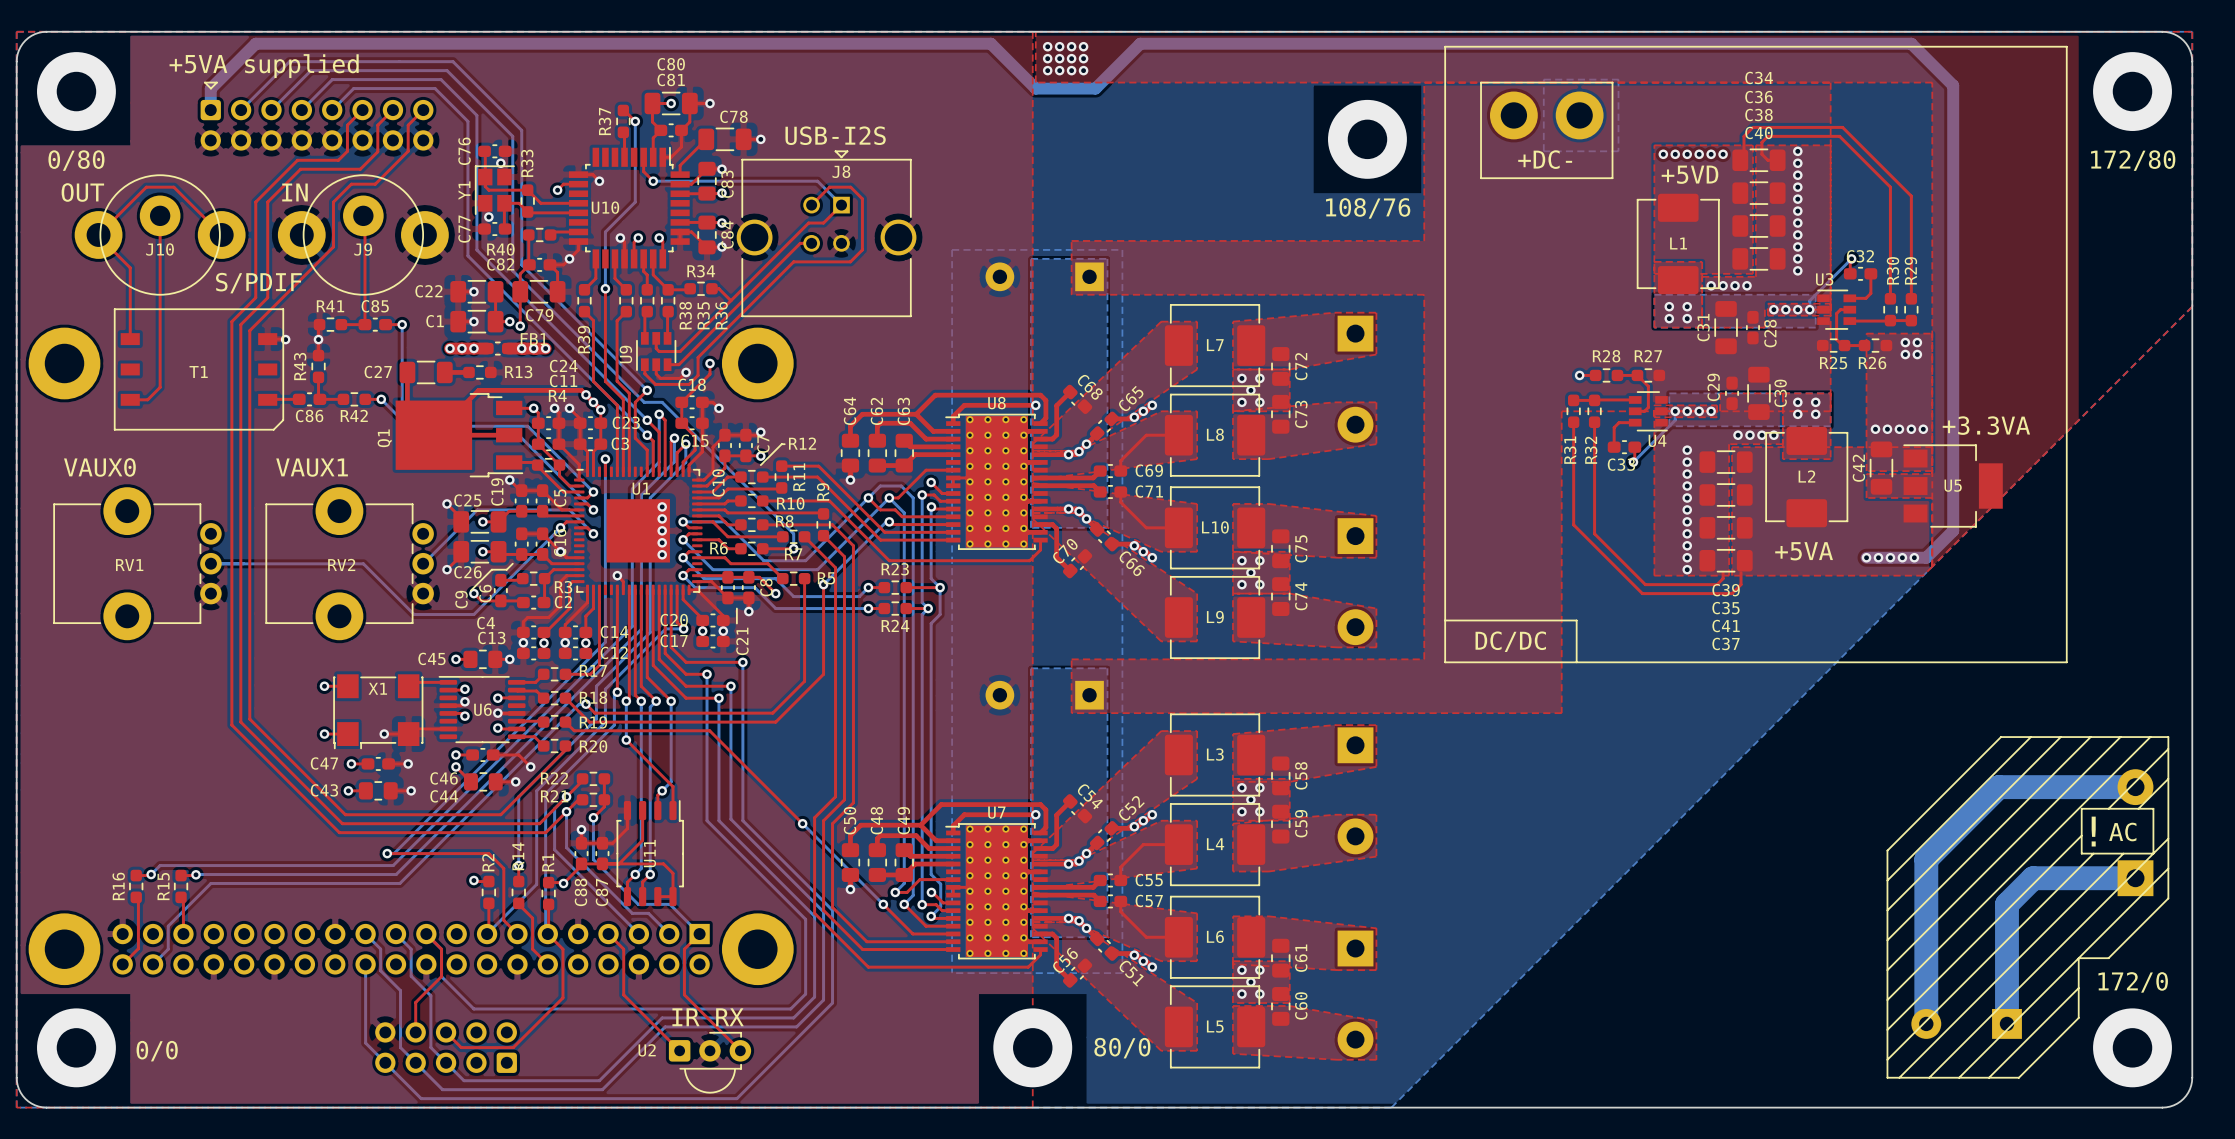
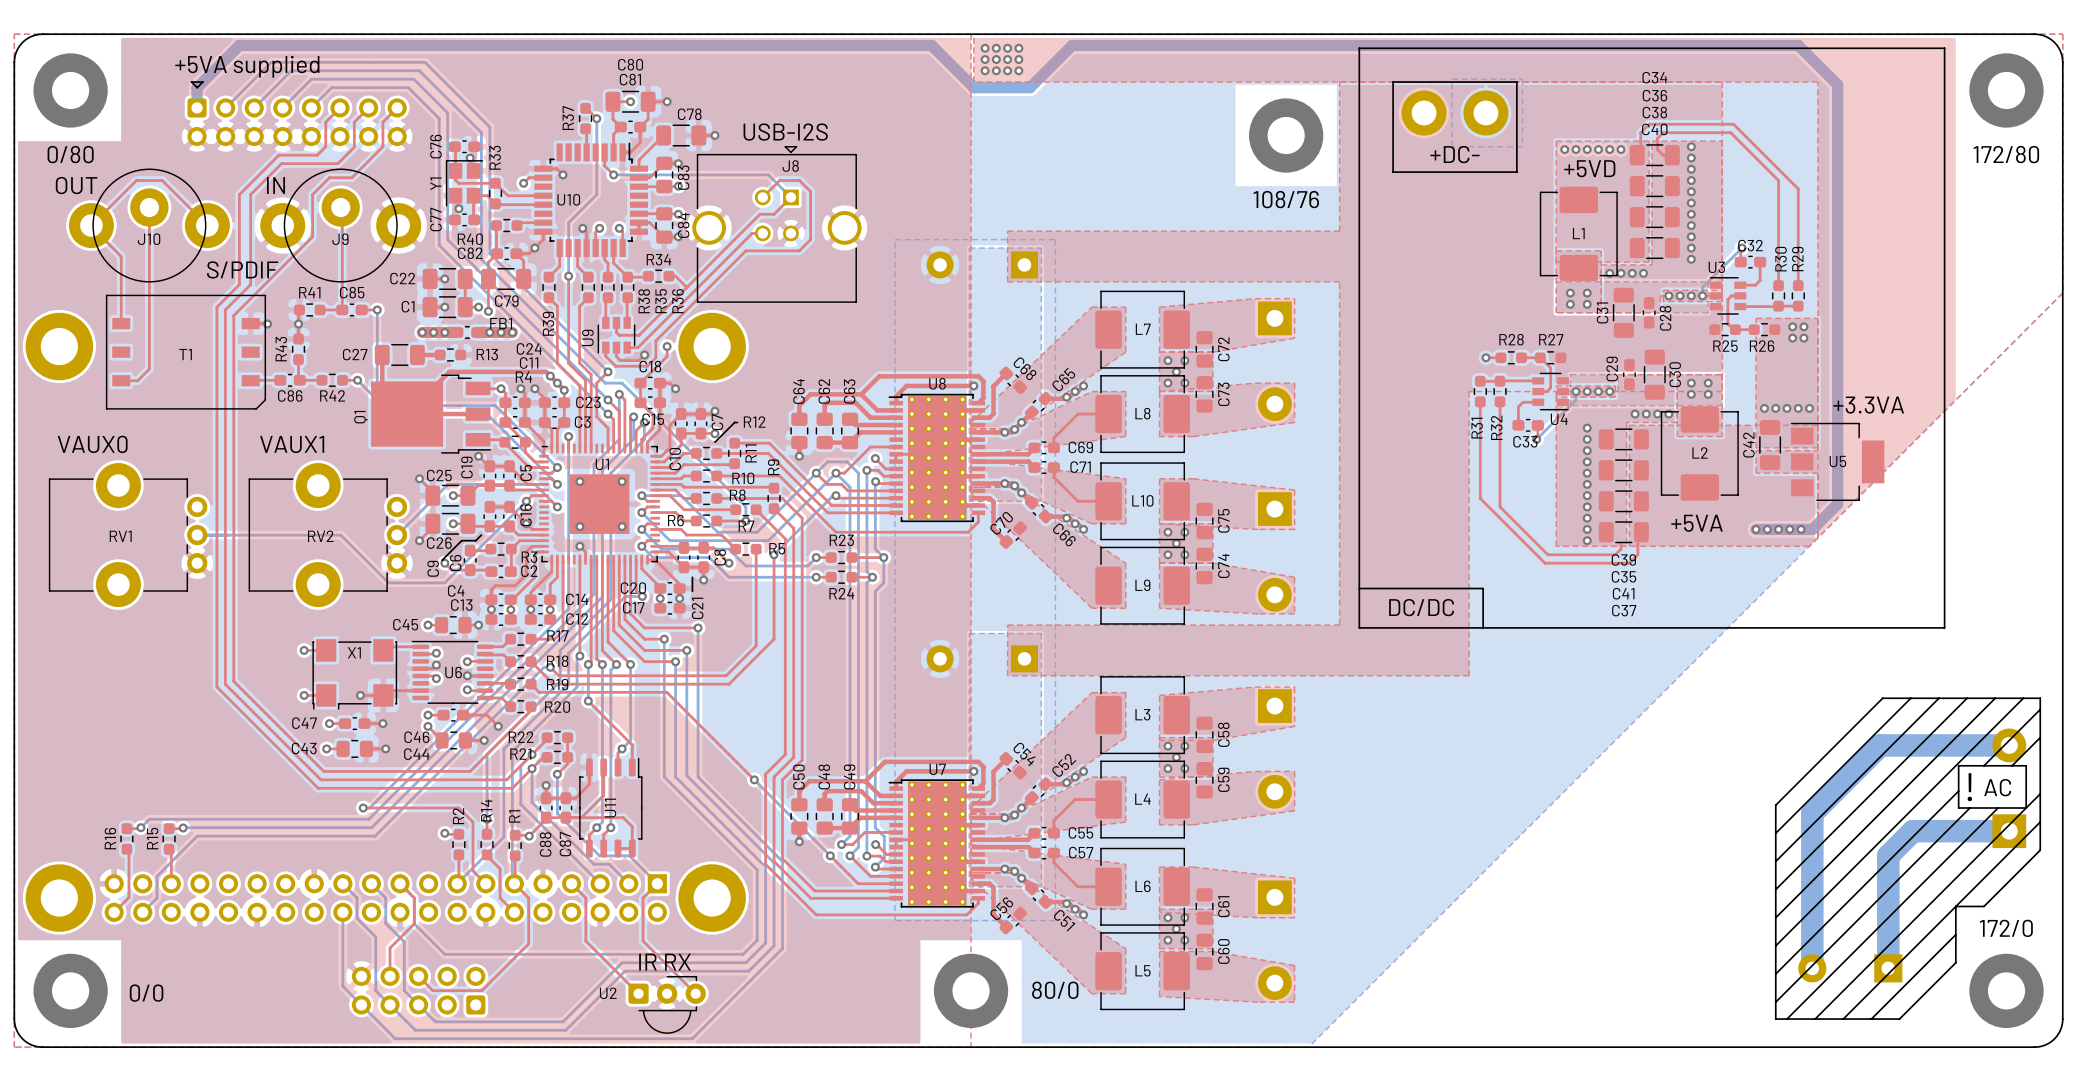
via: none -> (579, 481)
via: (662, 518) -> none
via: (662, 530) -> none
via: (662, 542) -> none
via: none -> (579, 526)

